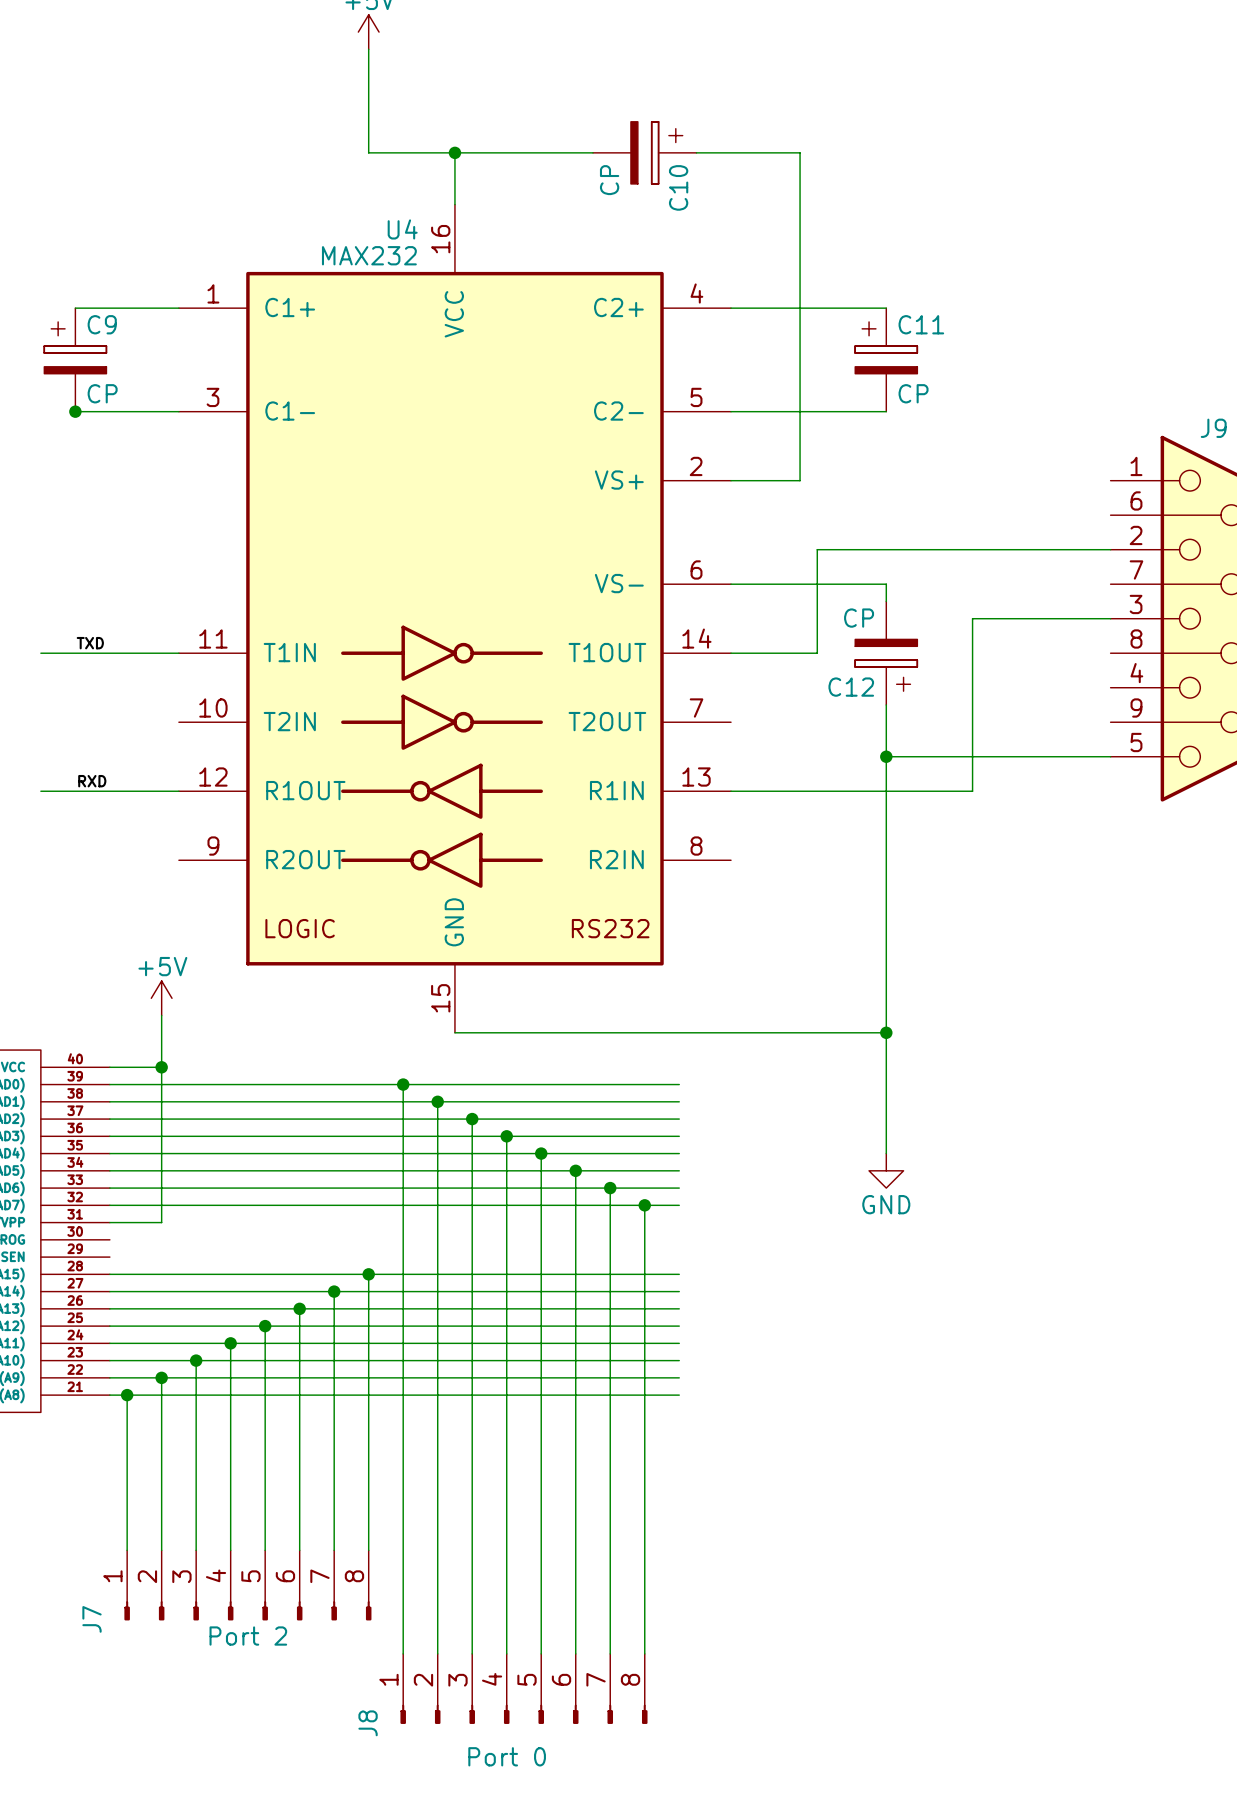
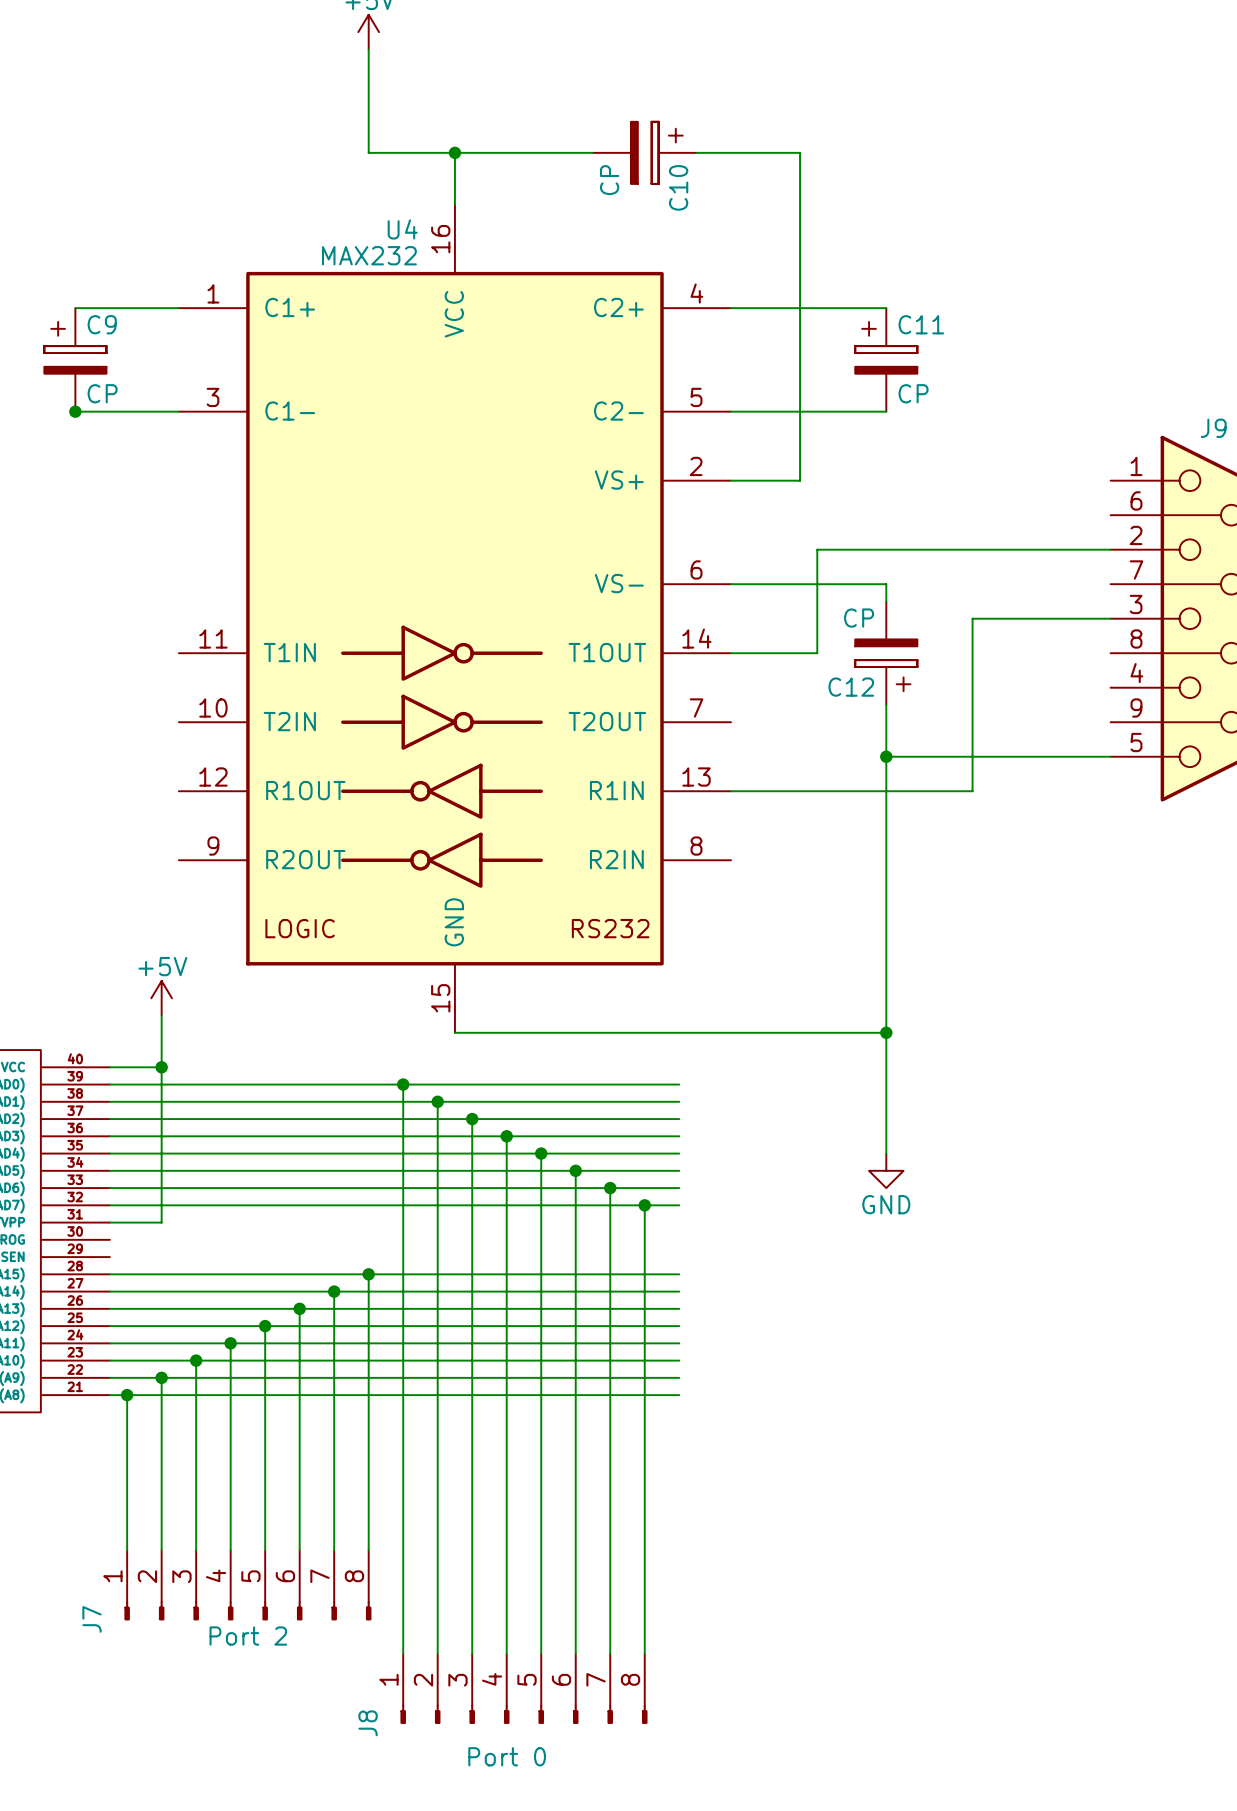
label: TXD (90, 643) -> none
wire: (40, 653) (178, 653) -> none
label: RXD (92, 781) -> none
wire: (40, 791) (178, 791) -> none

